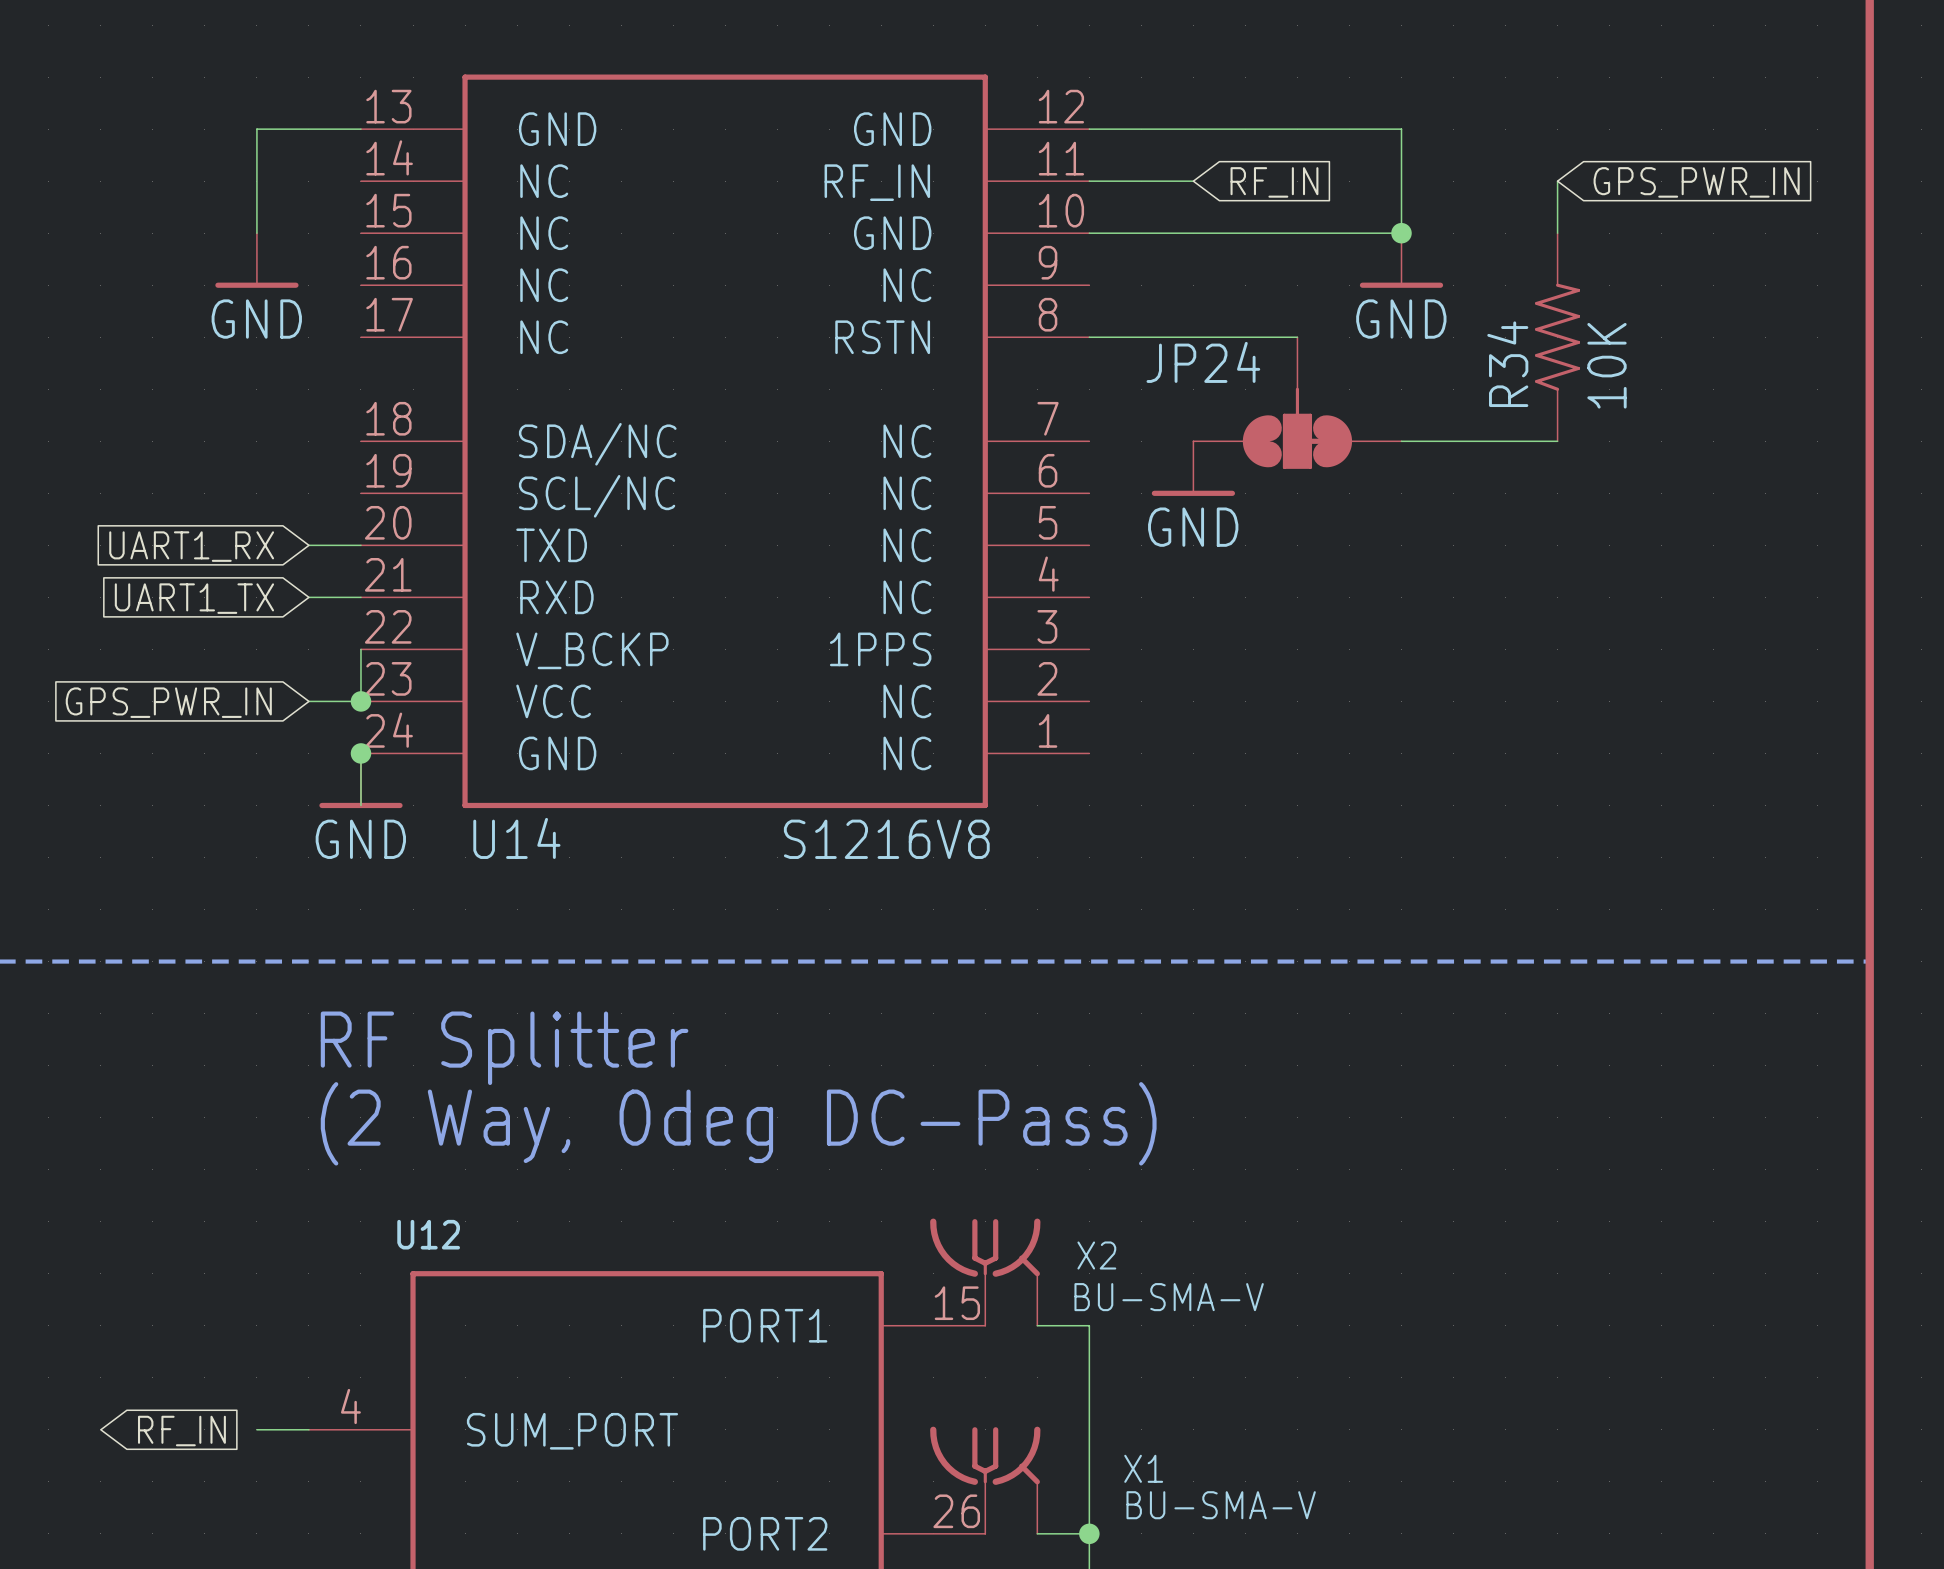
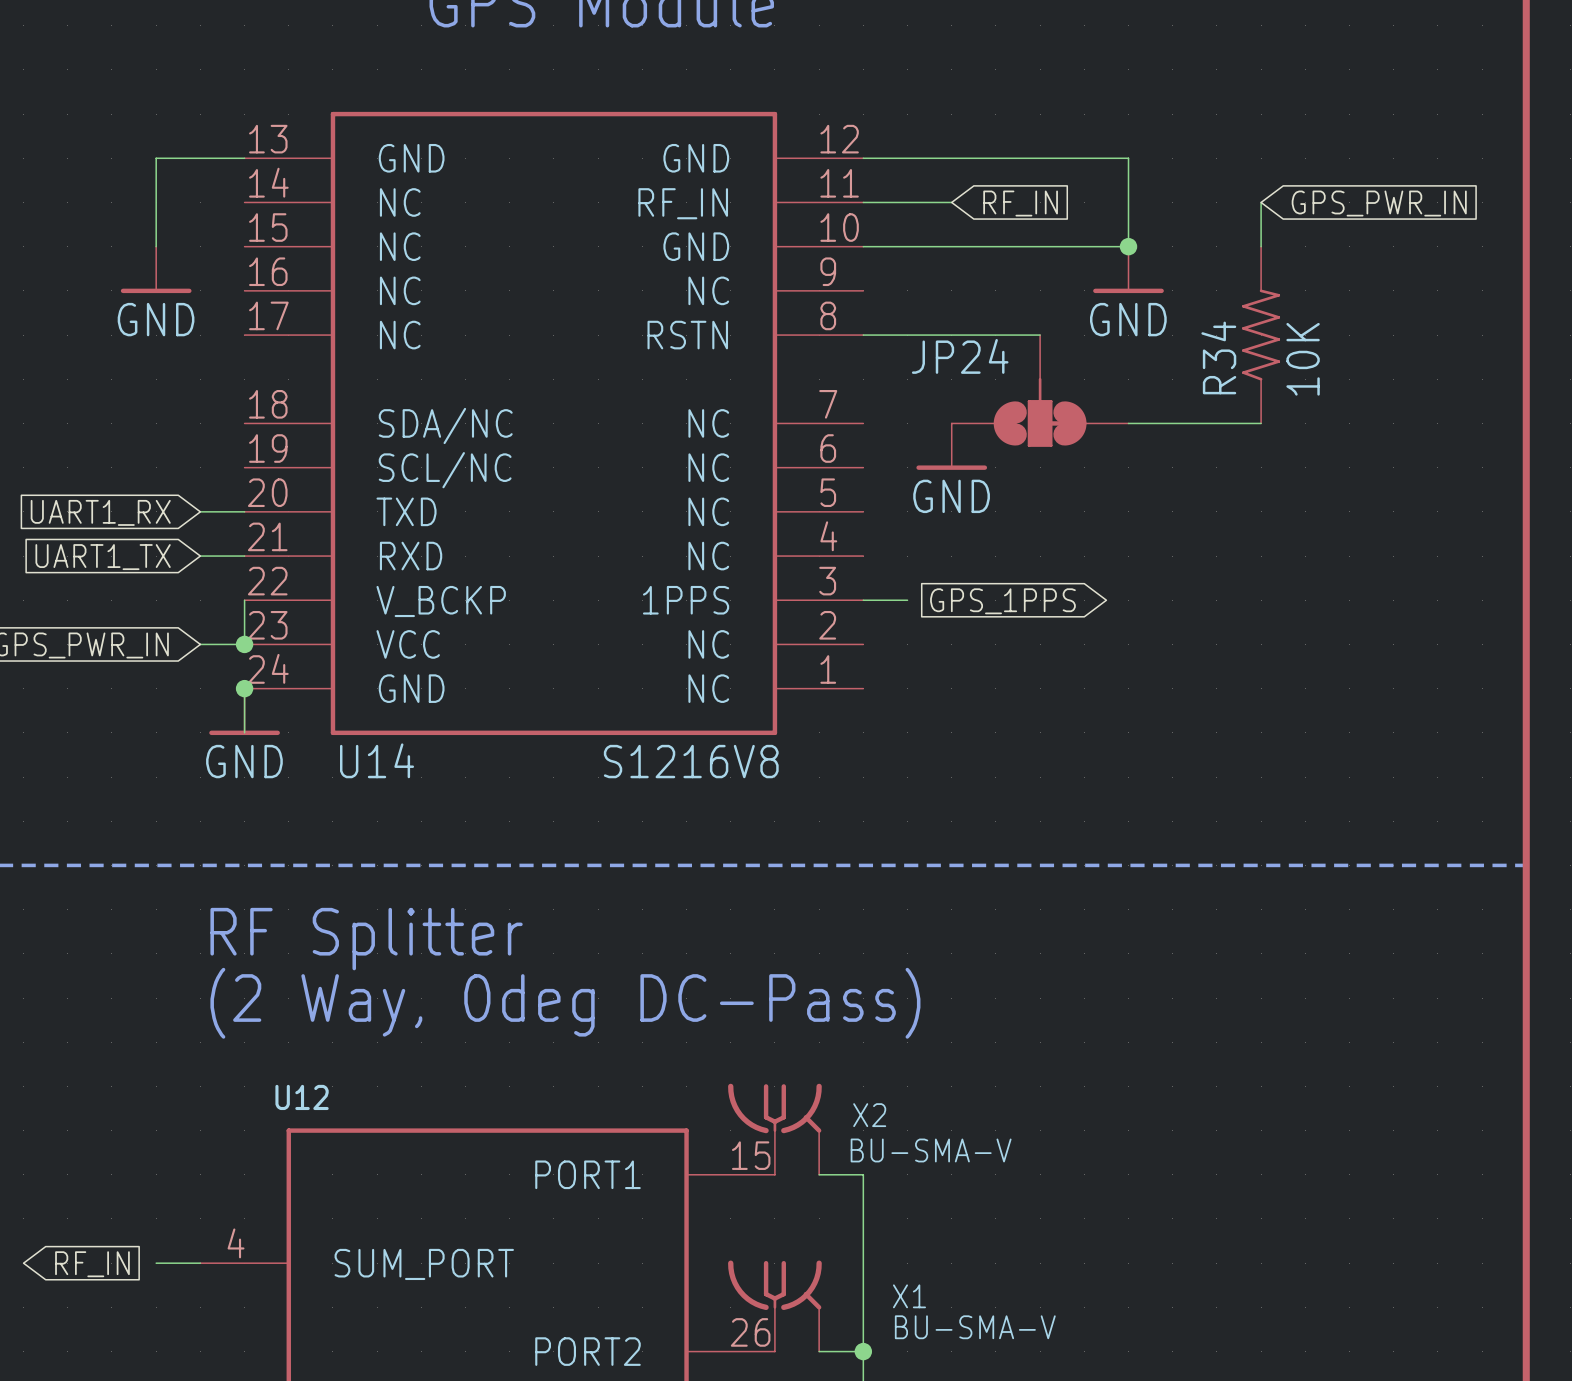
wire: none -> (863, 600) (907, 600)
global label: none -> GPS_1PPS (1002, 601)

